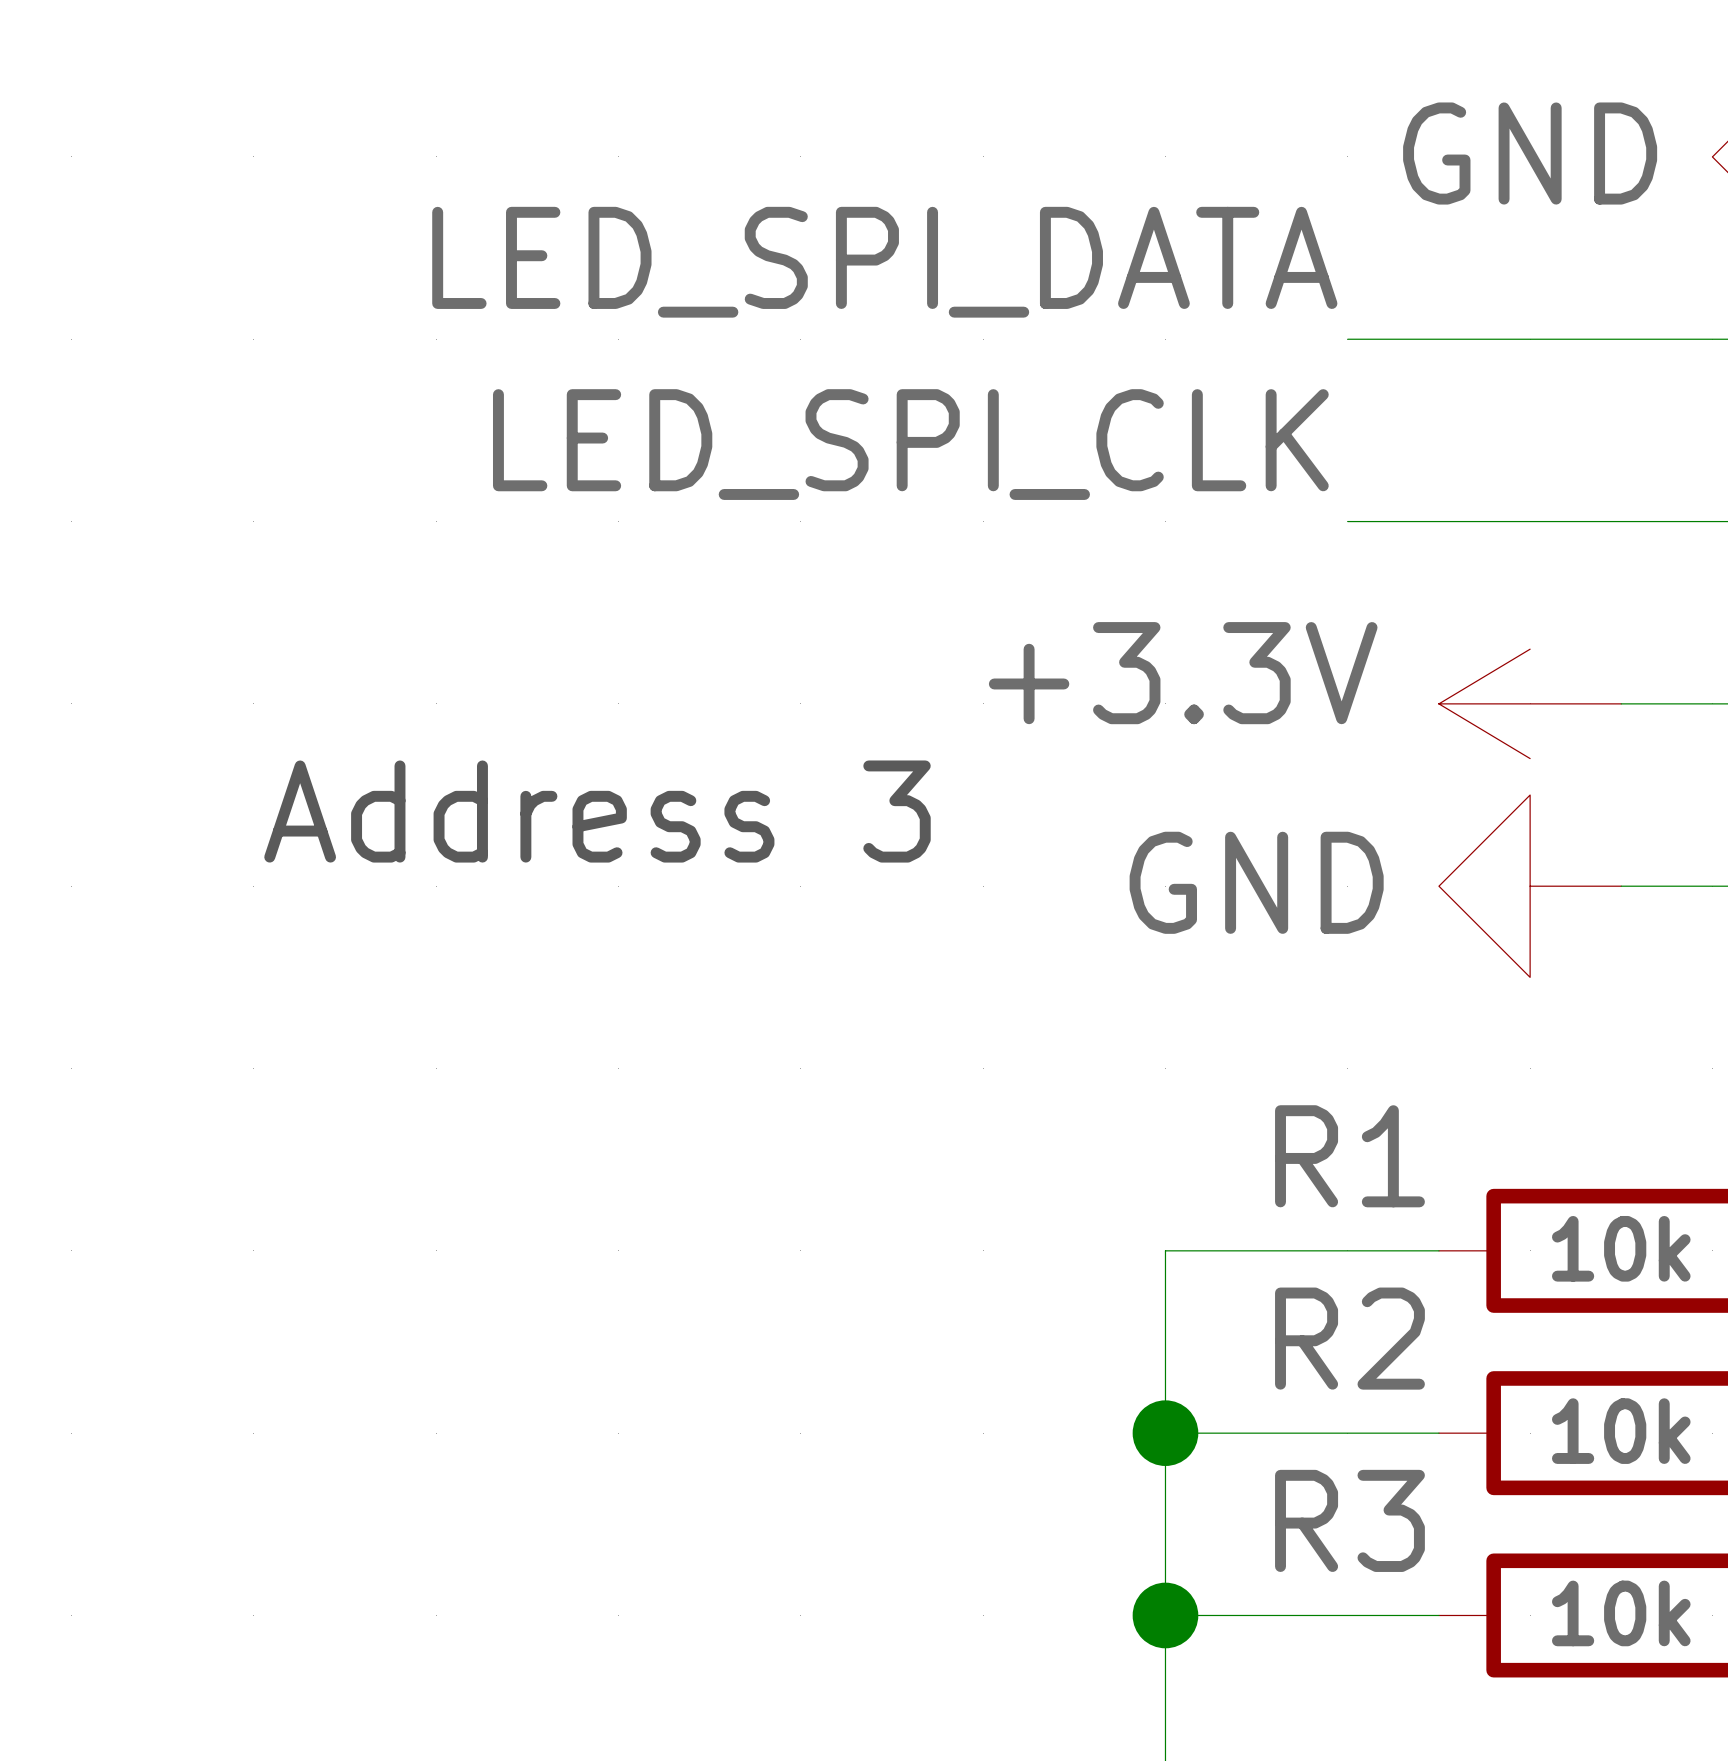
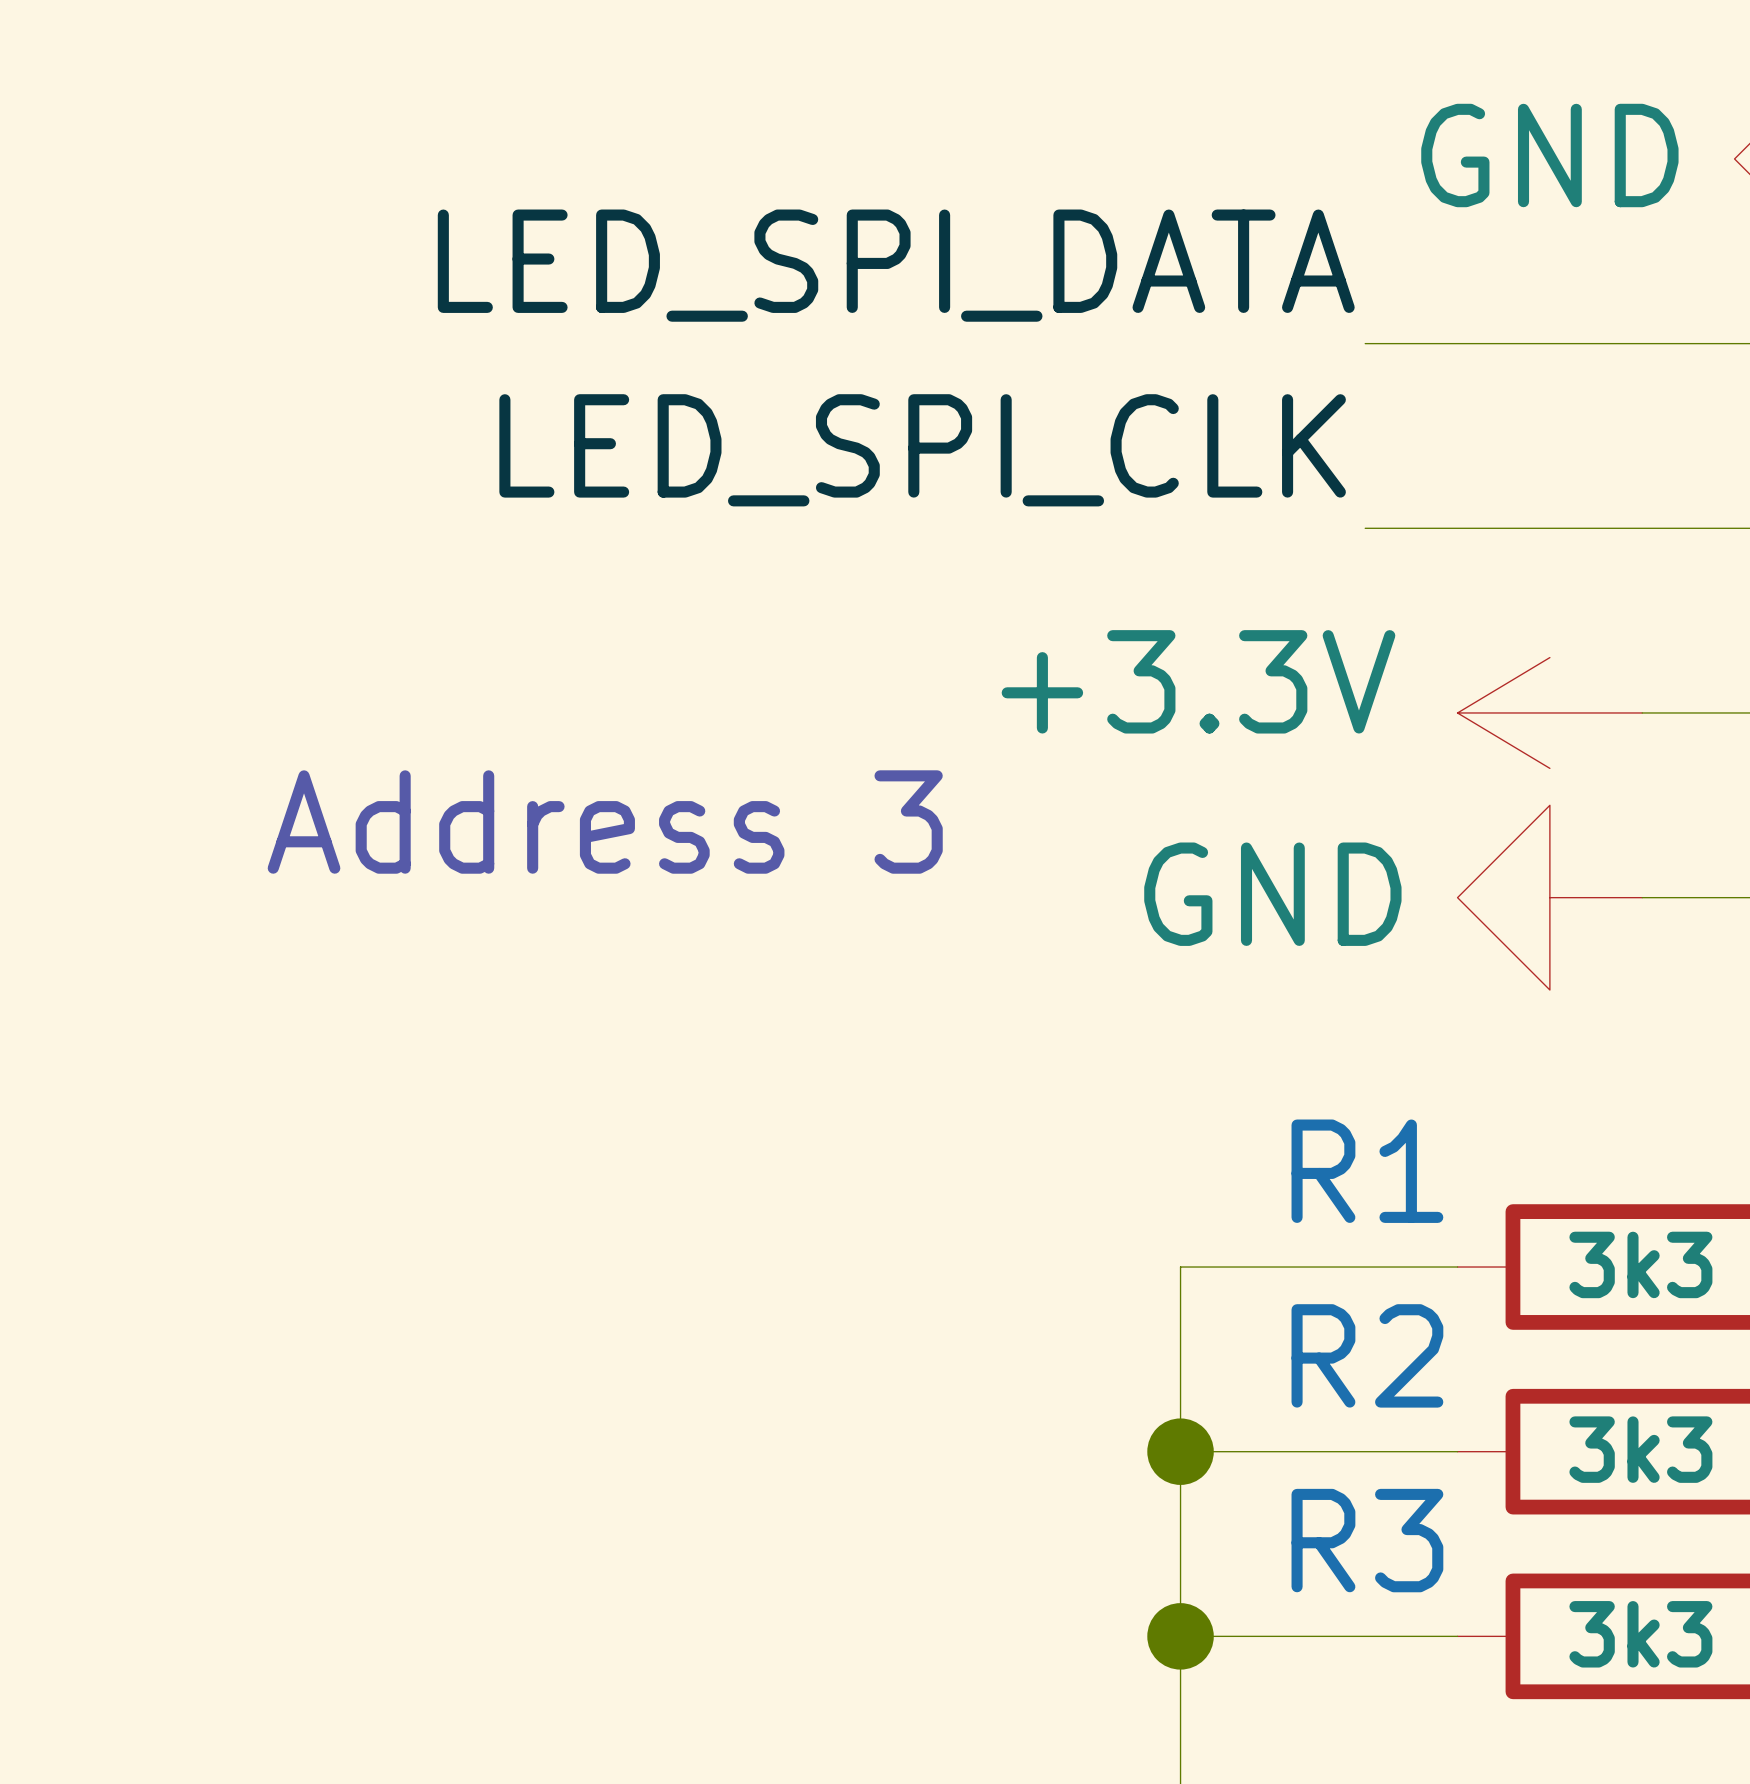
R1 value: 10k (1621, 1248) -> 3k3 (1640, 1264)
R2 value: 10k (1621, 1431) -> 3k3 (1640, 1449)
R3 value: 10k (1621, 1613) -> 3k3 (1640, 1634)

